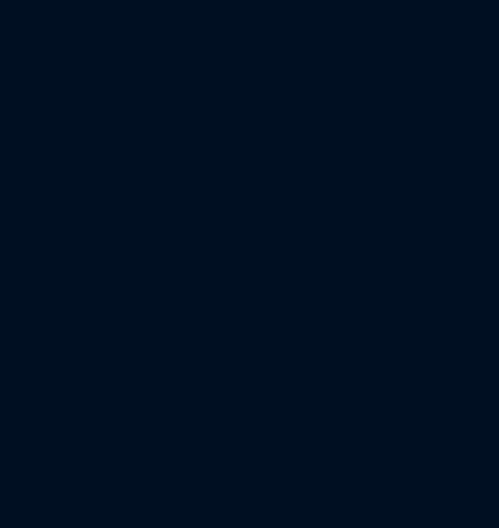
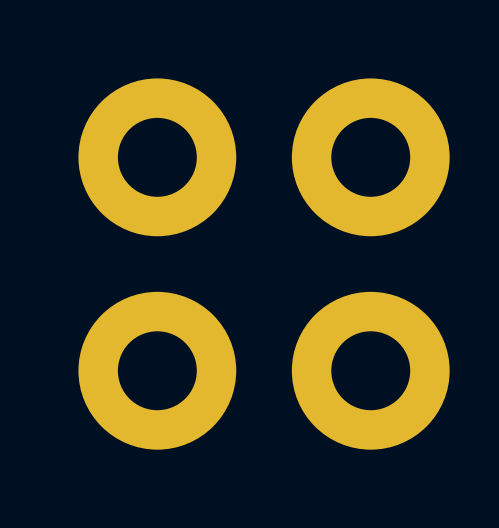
part: none -> (157, 157)
part: none -> (370, 157)
part: none -> (157, 370)
part: none -> (370, 370)

